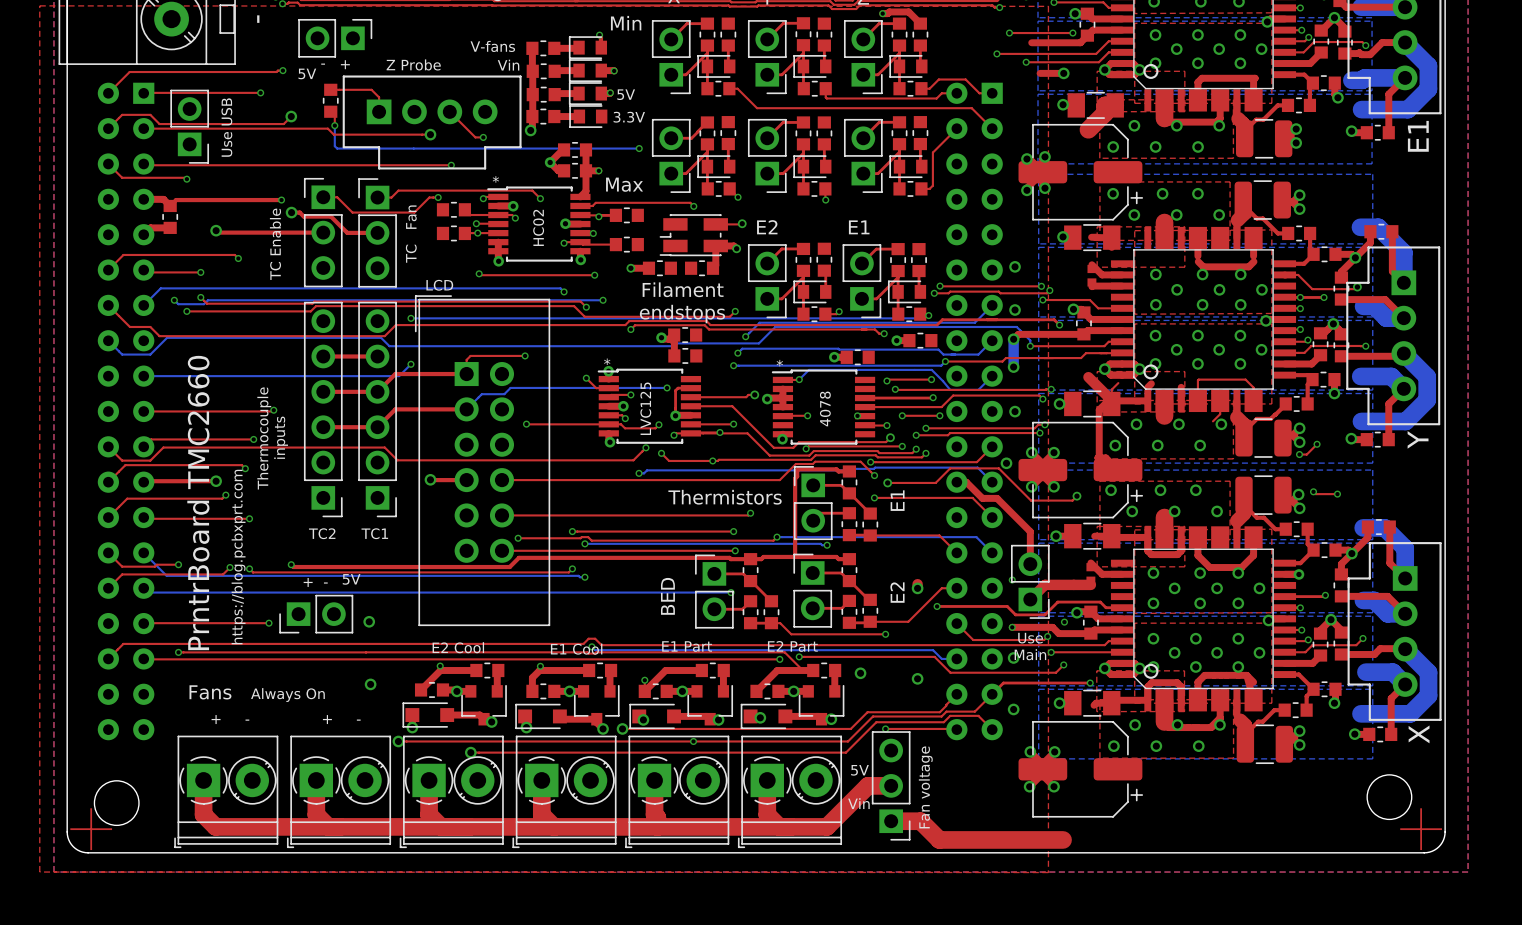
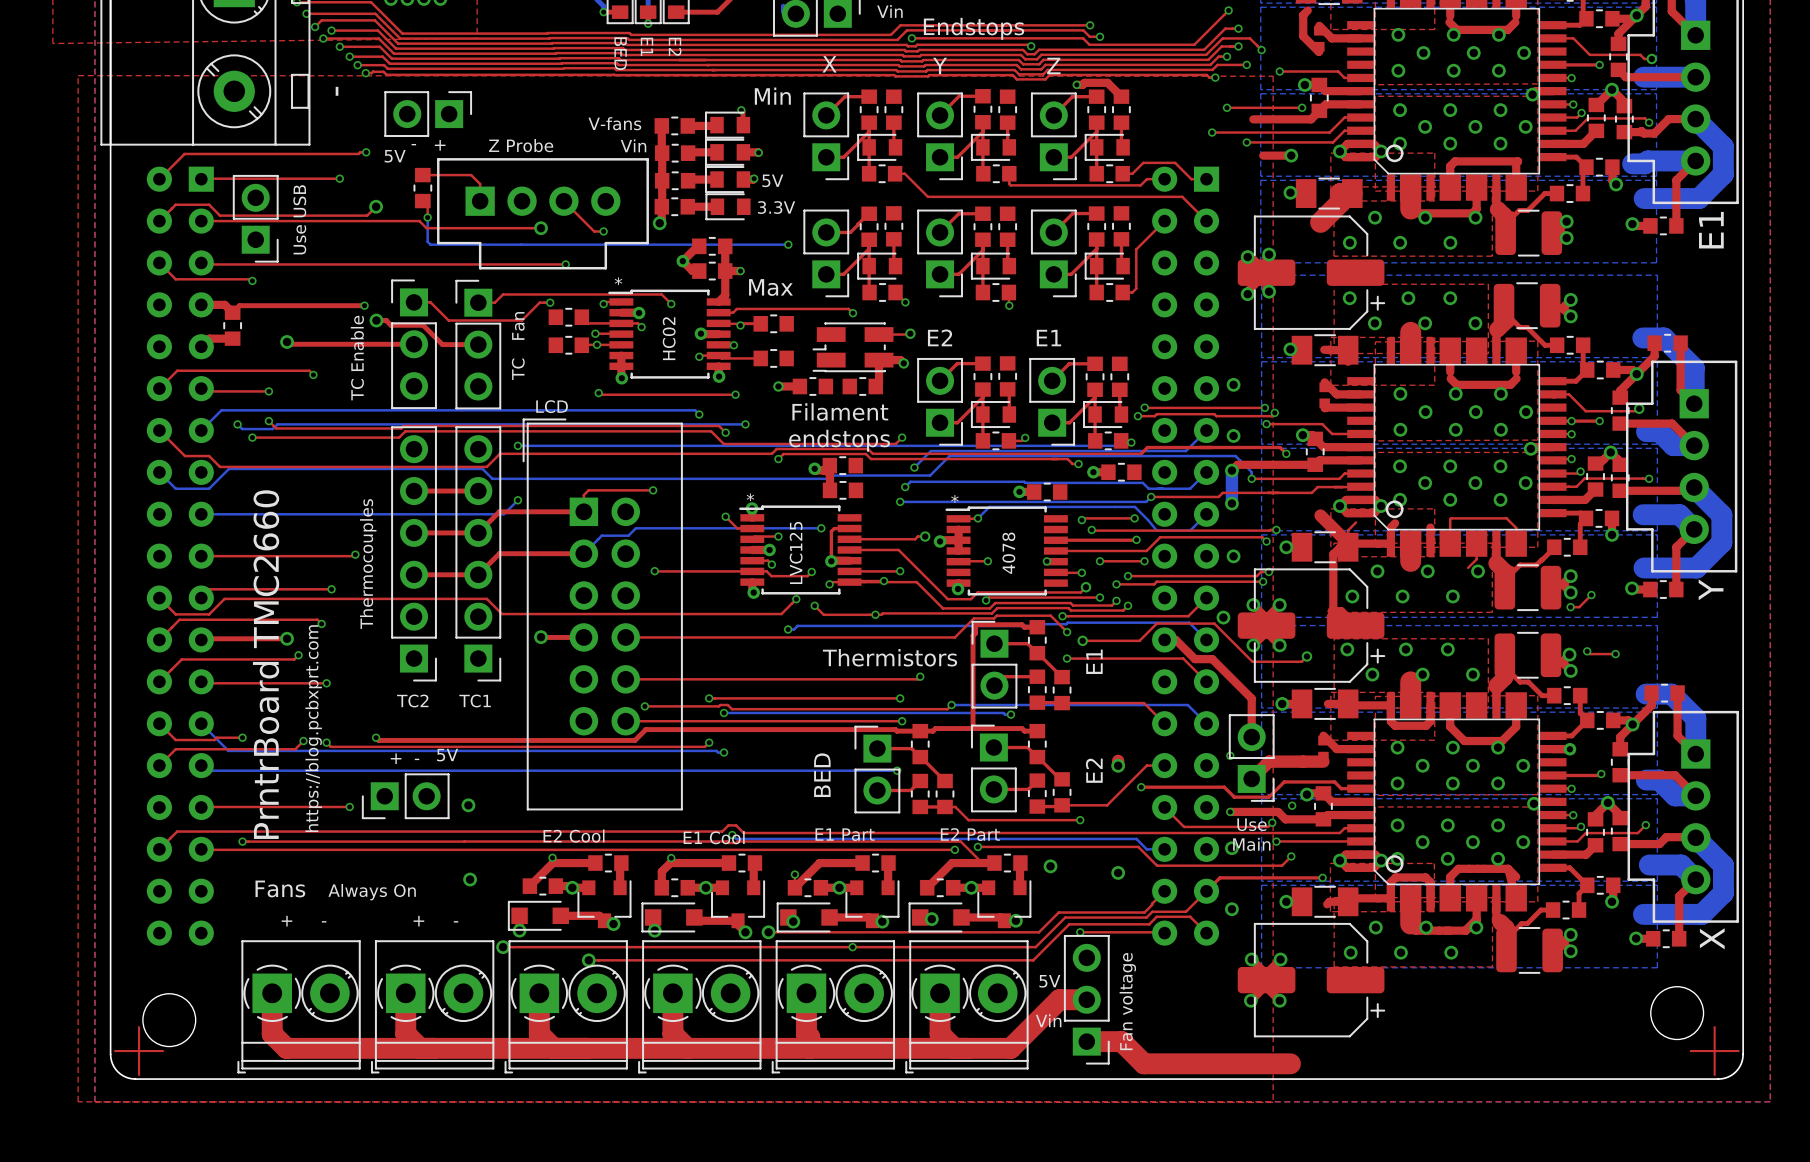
text: inputs (281, 437) -> none
text: Thermocouple (264, 438) -> Thermocouples (368, 564)

